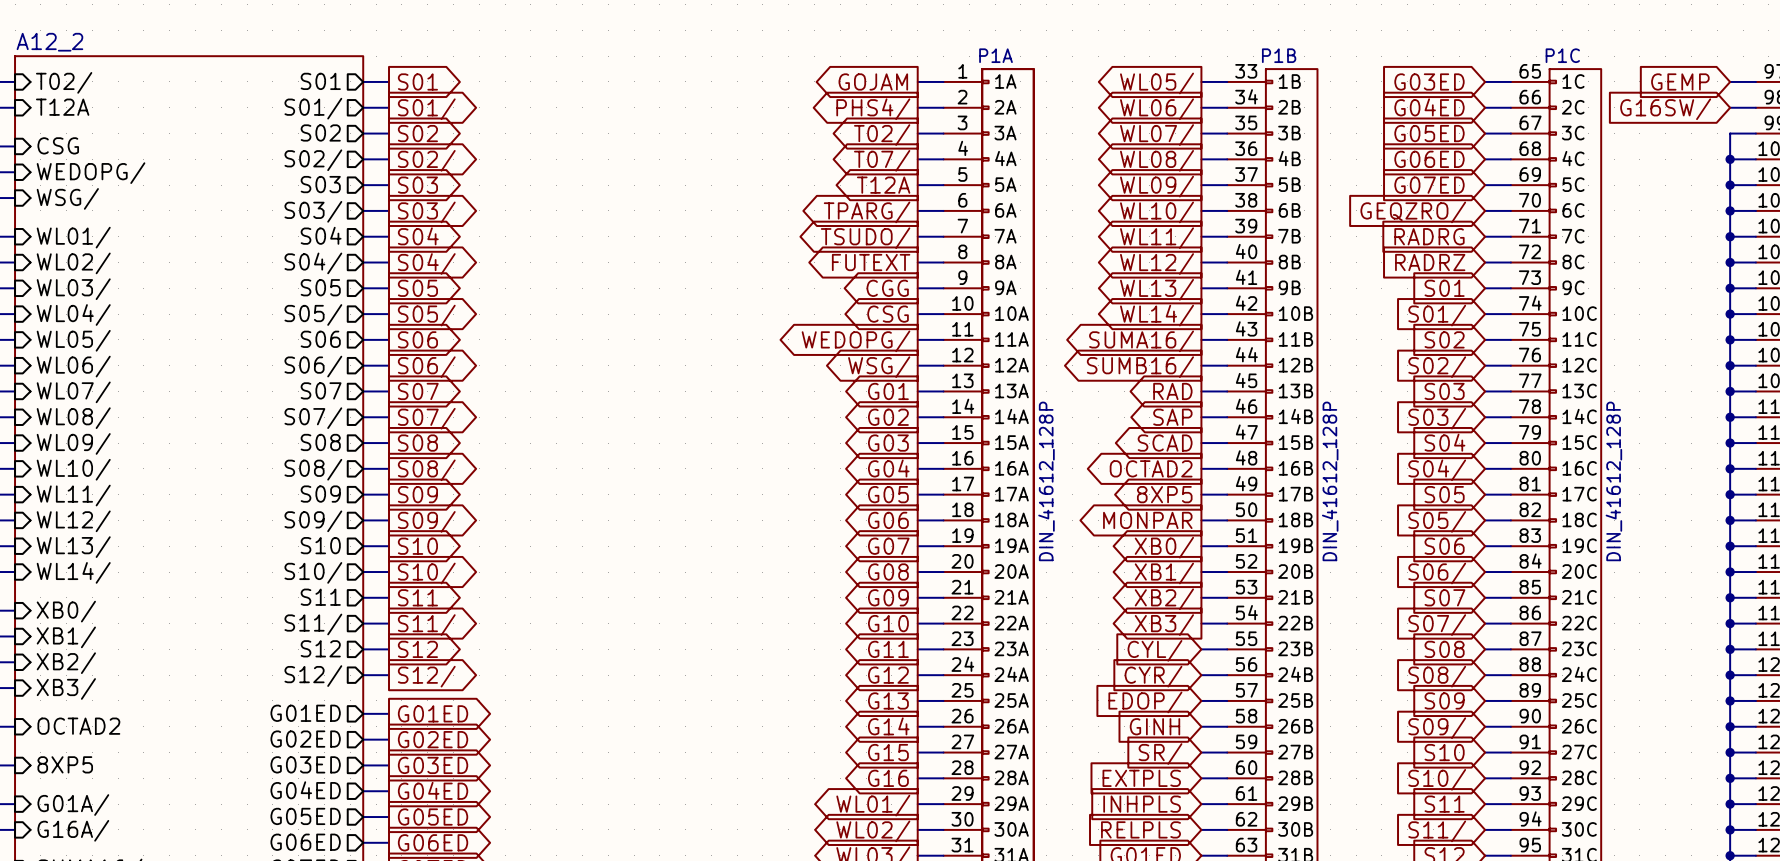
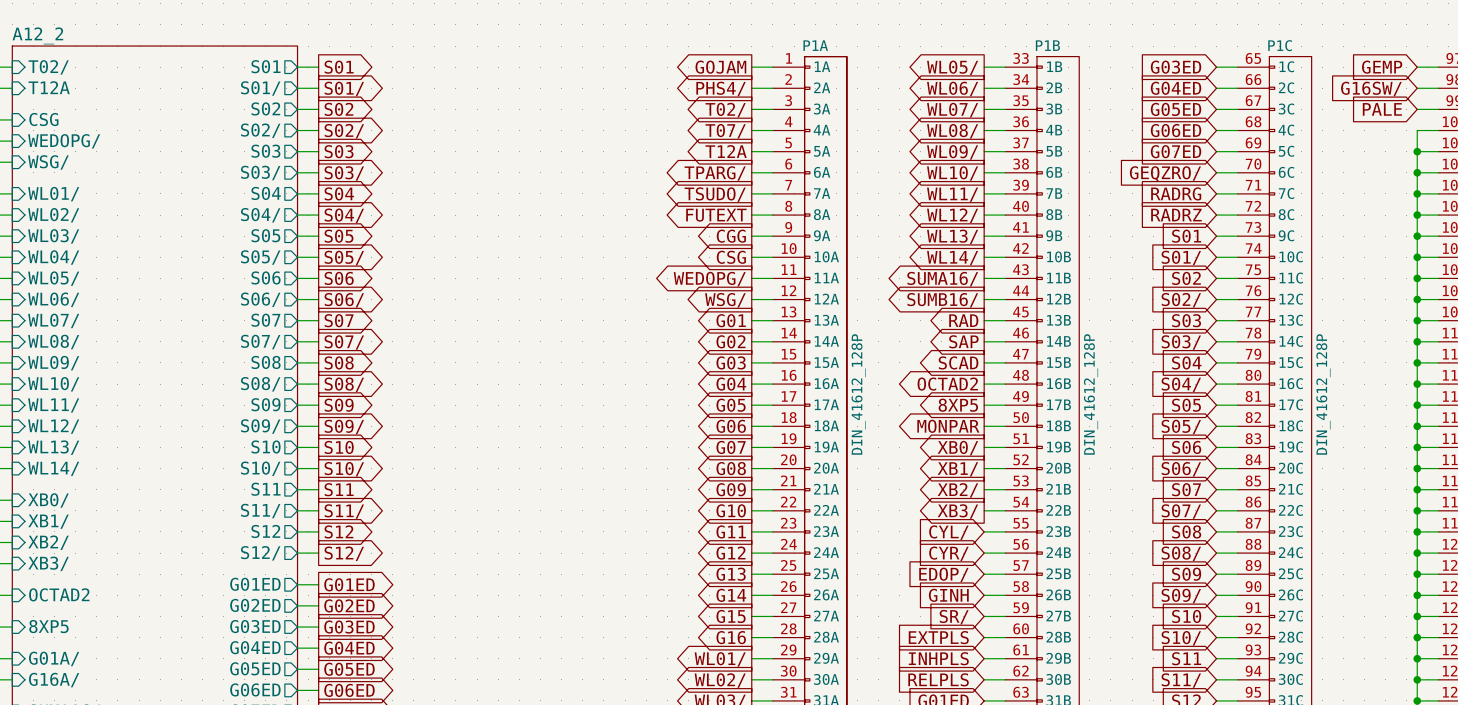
global label: none -> PALE (1382, 109)
wire: (1730, 133) (1730, 159) -> none
junction: (1730, 159) -> none

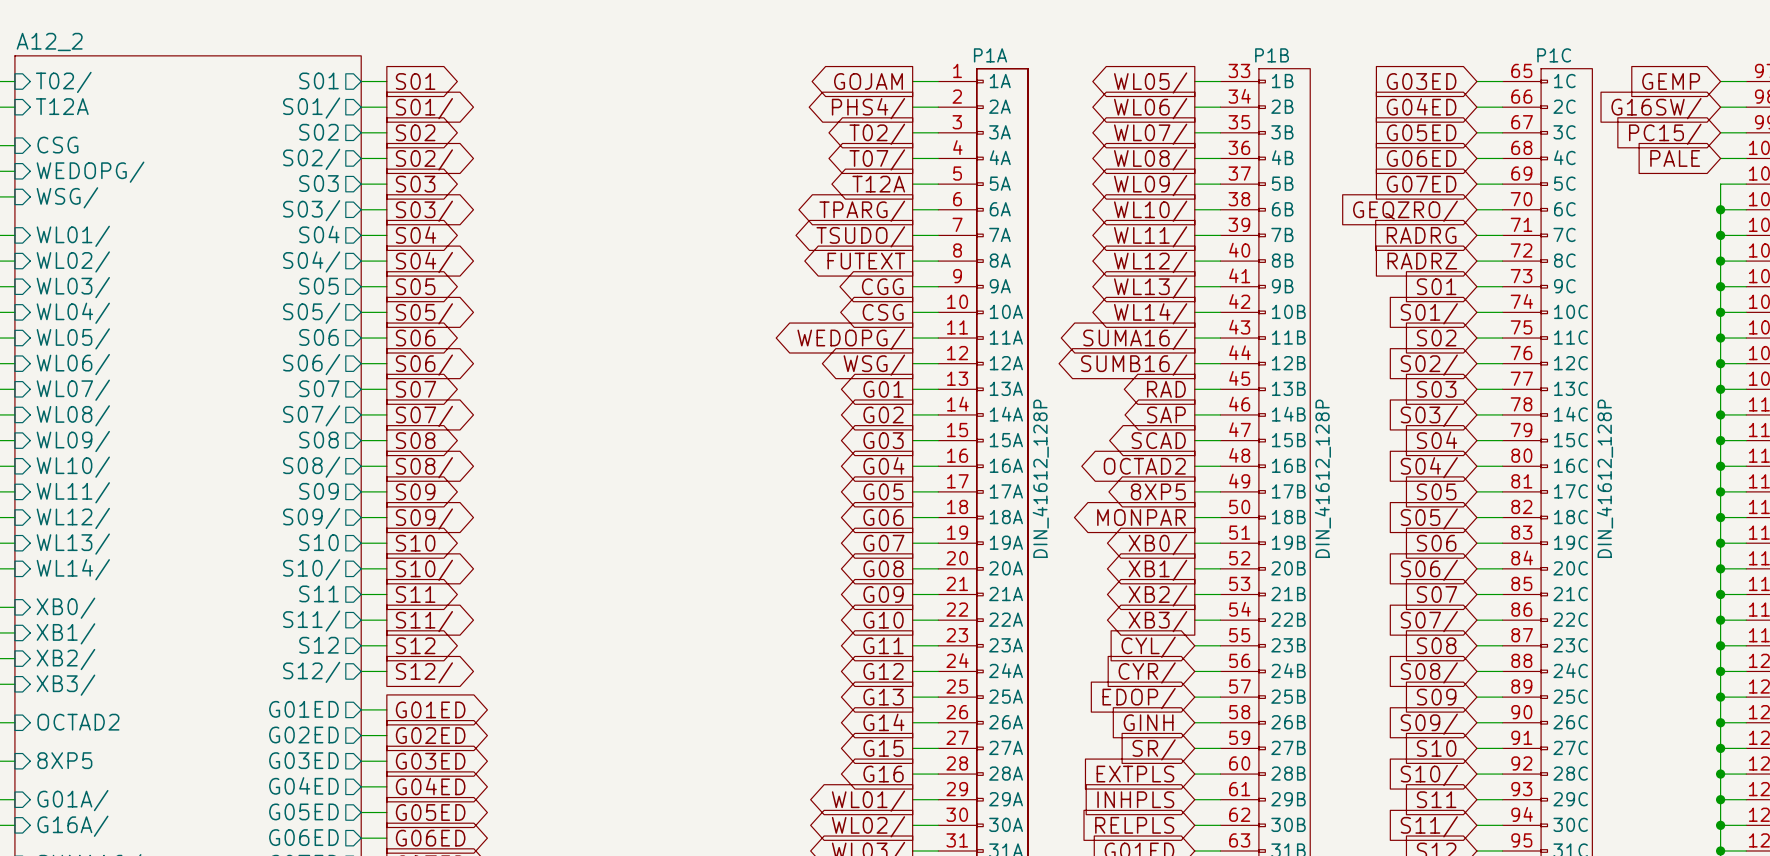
global label: PALE (1382, 109) -> PC15/ (1665, 134)
global label: none -> PALE (1675, 158)
wire: (1417, 130) (1417, 151) -> none
junction: (1417, 151) -> none

